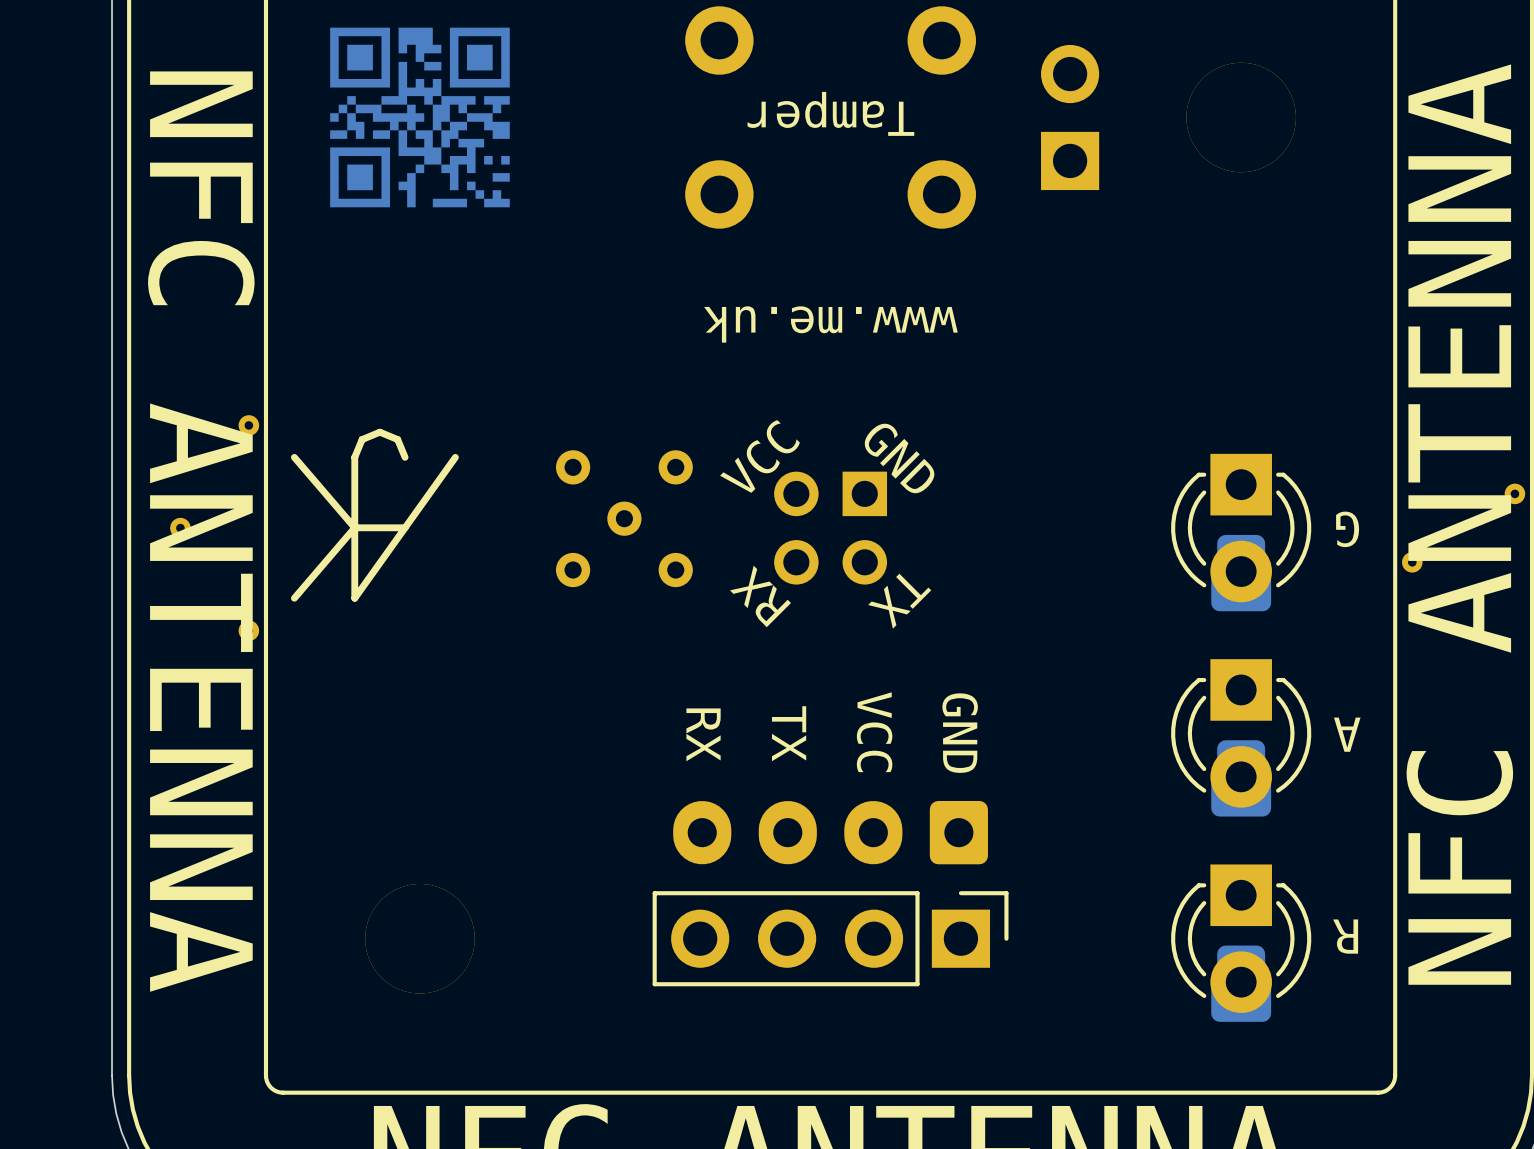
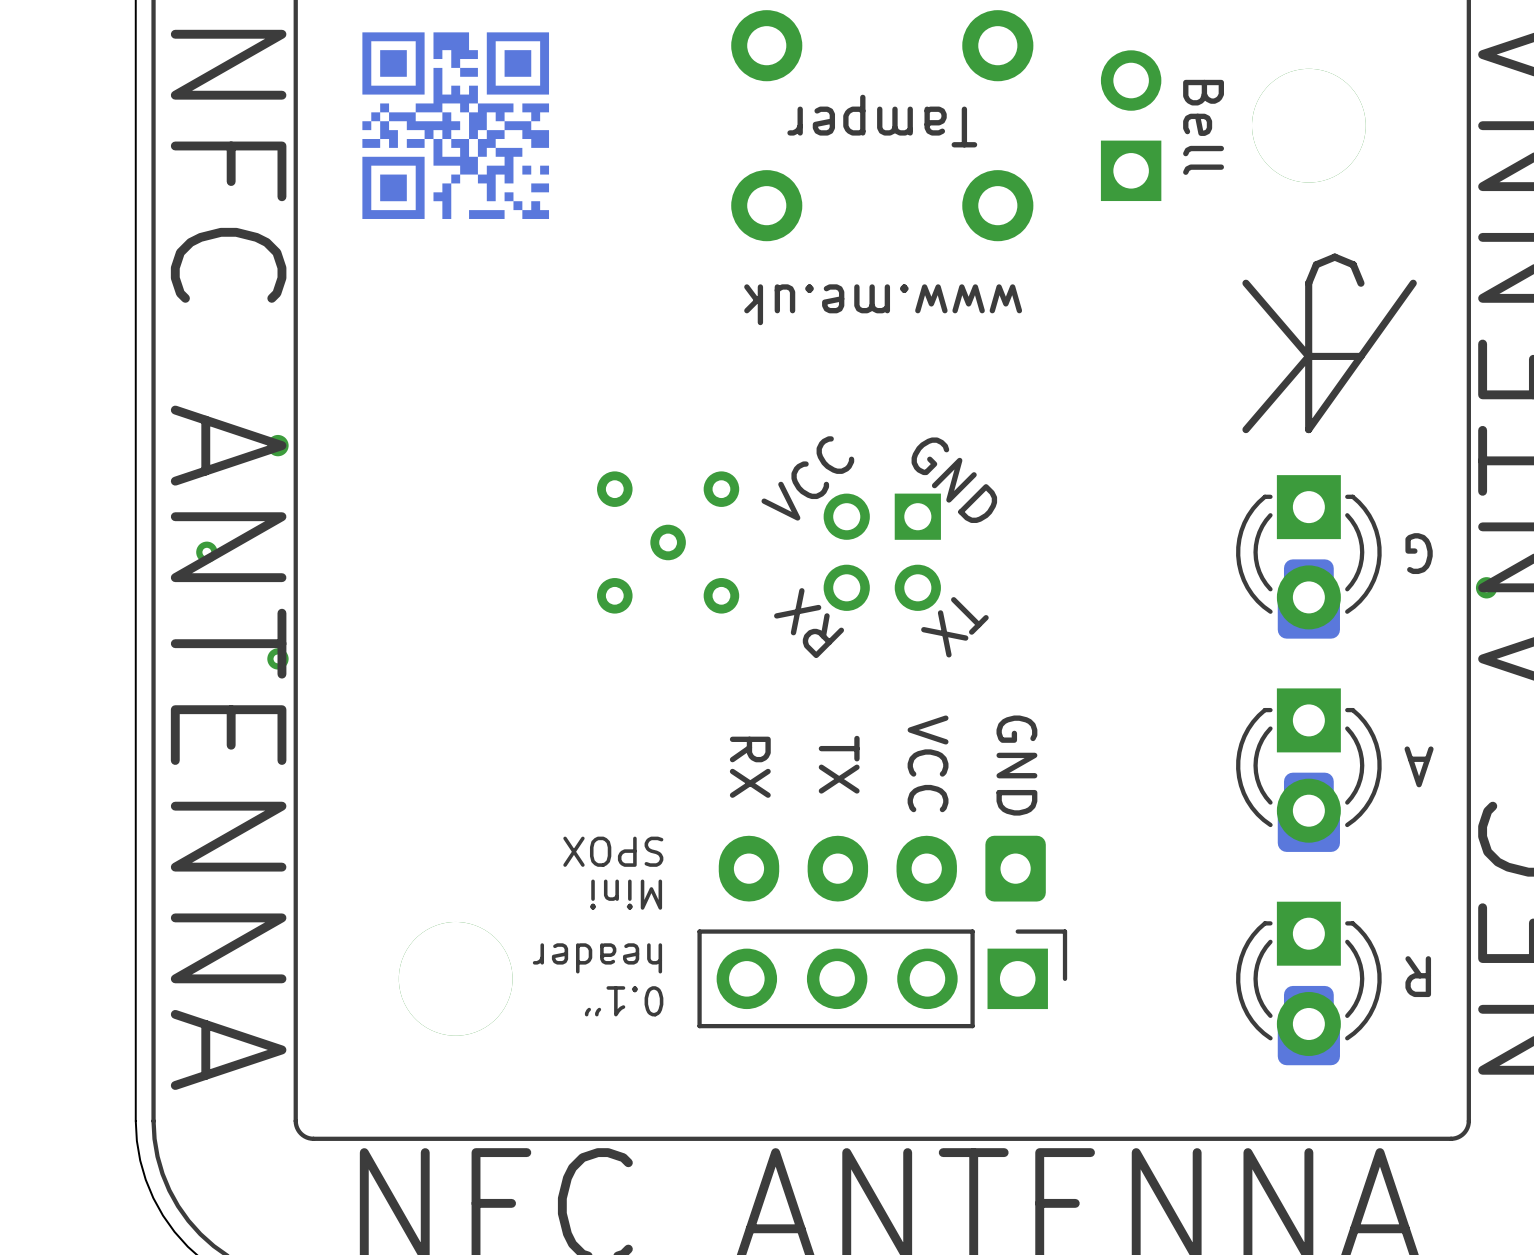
text: none -> Bell (1203, 127)
drawing: none -> [1242, 253, 1417, 434]
text position: www.me.uk (830, 324) -> www.me.uk (883, 304)
drawing: [290, 428, 459, 602] -> none
text: none -> SPOX (613, 851)
text: none -> Mini (626, 894)
text: none -> header (597, 958)
text: none -> 0.1” (624, 1001)

